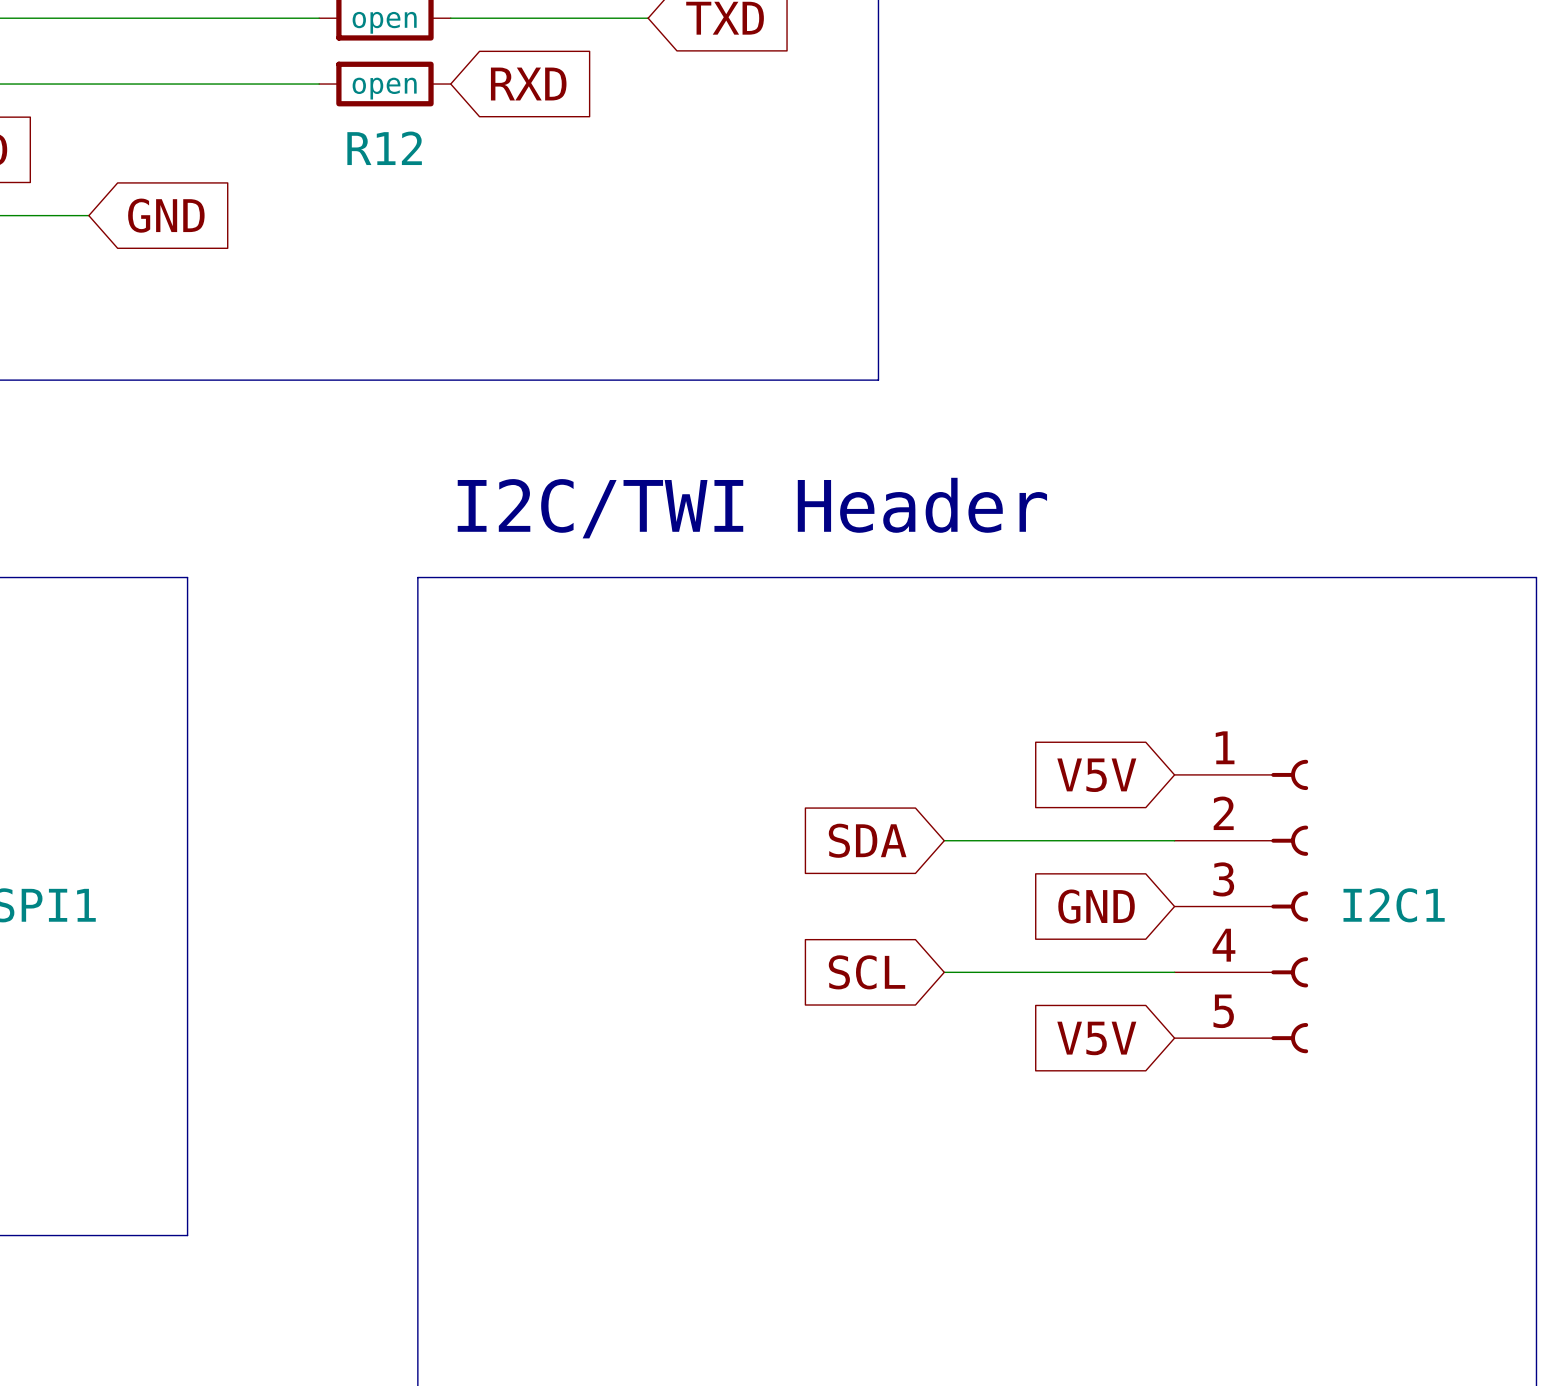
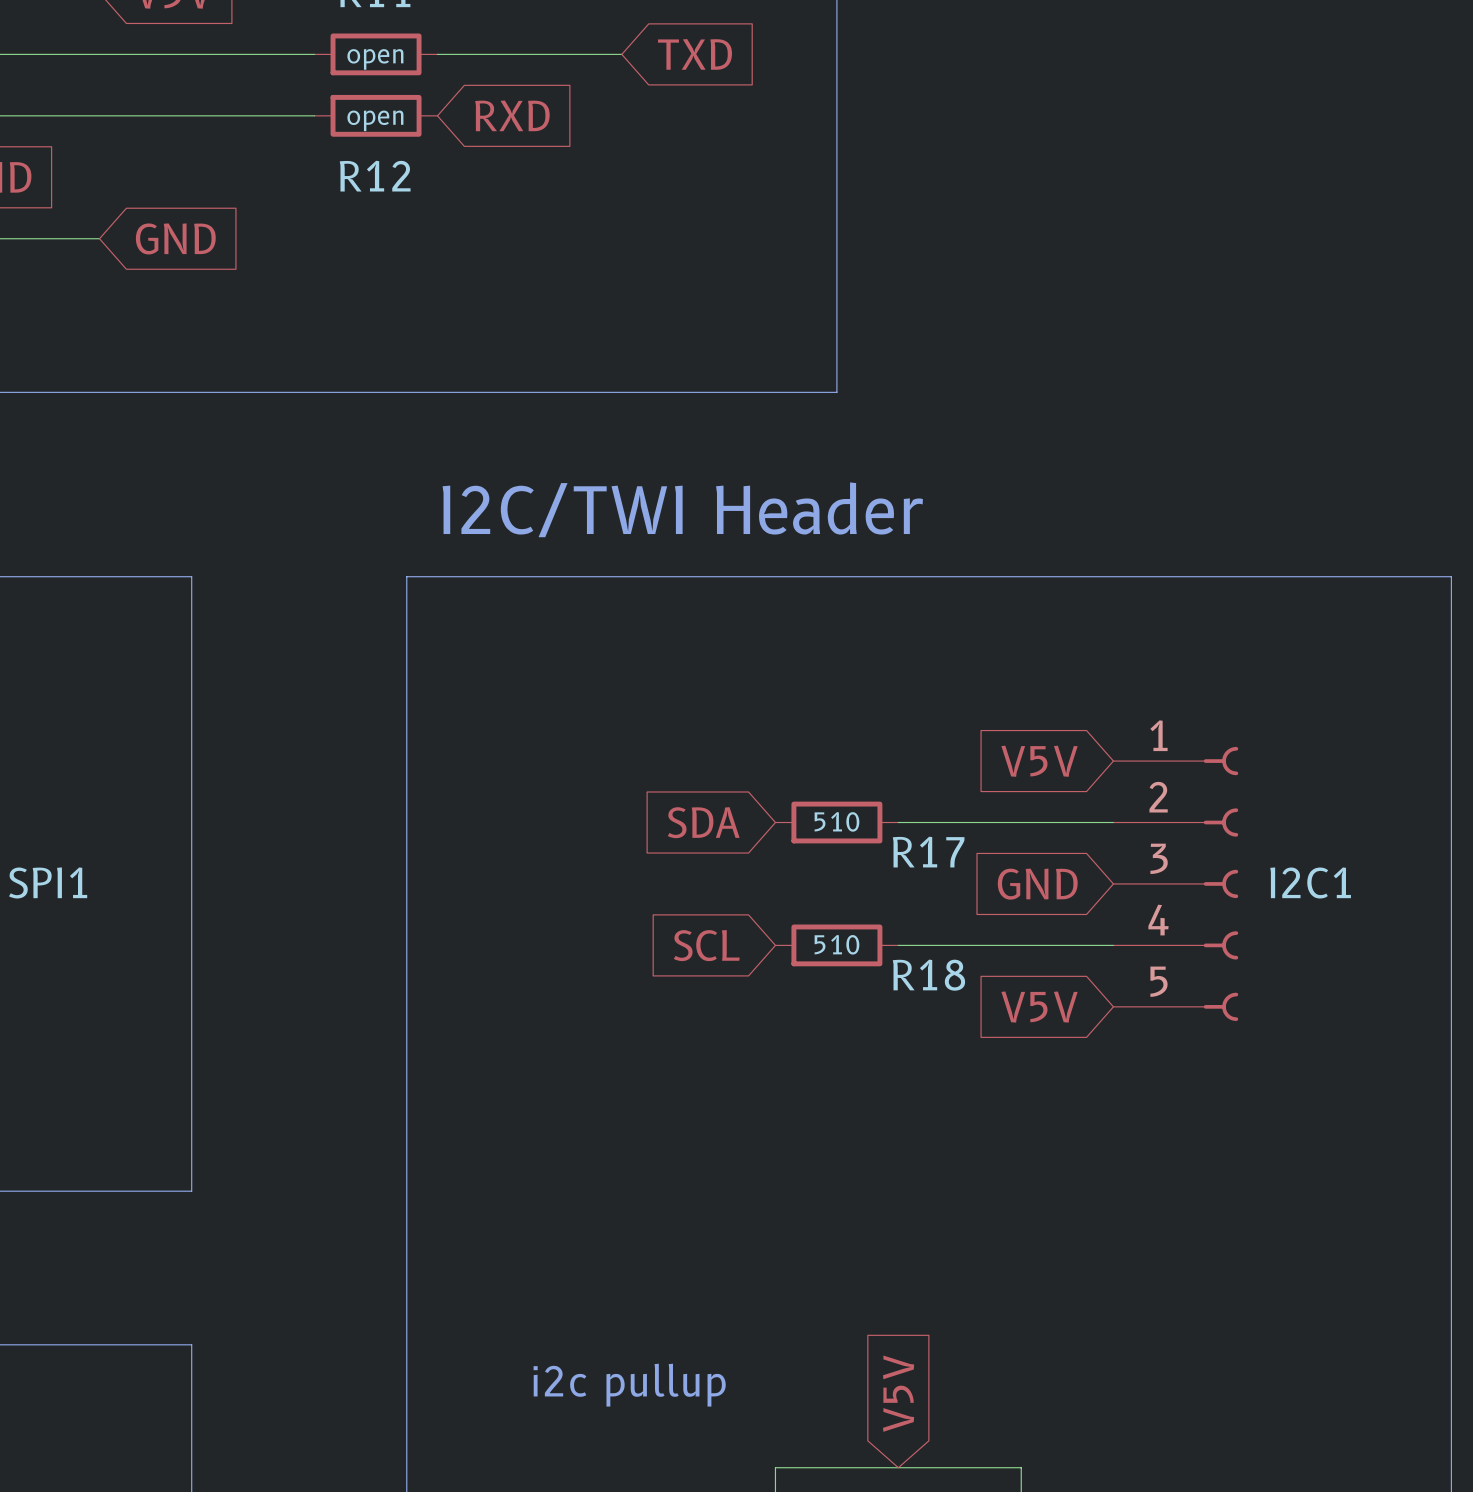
global label position: SDA (867, 840) -> SDA (703, 822)
R17: none -> 510 (836, 822)
global label position: SCL (867, 972) -> SCL (706, 945)
R18: none -> 510 (836, 945)

